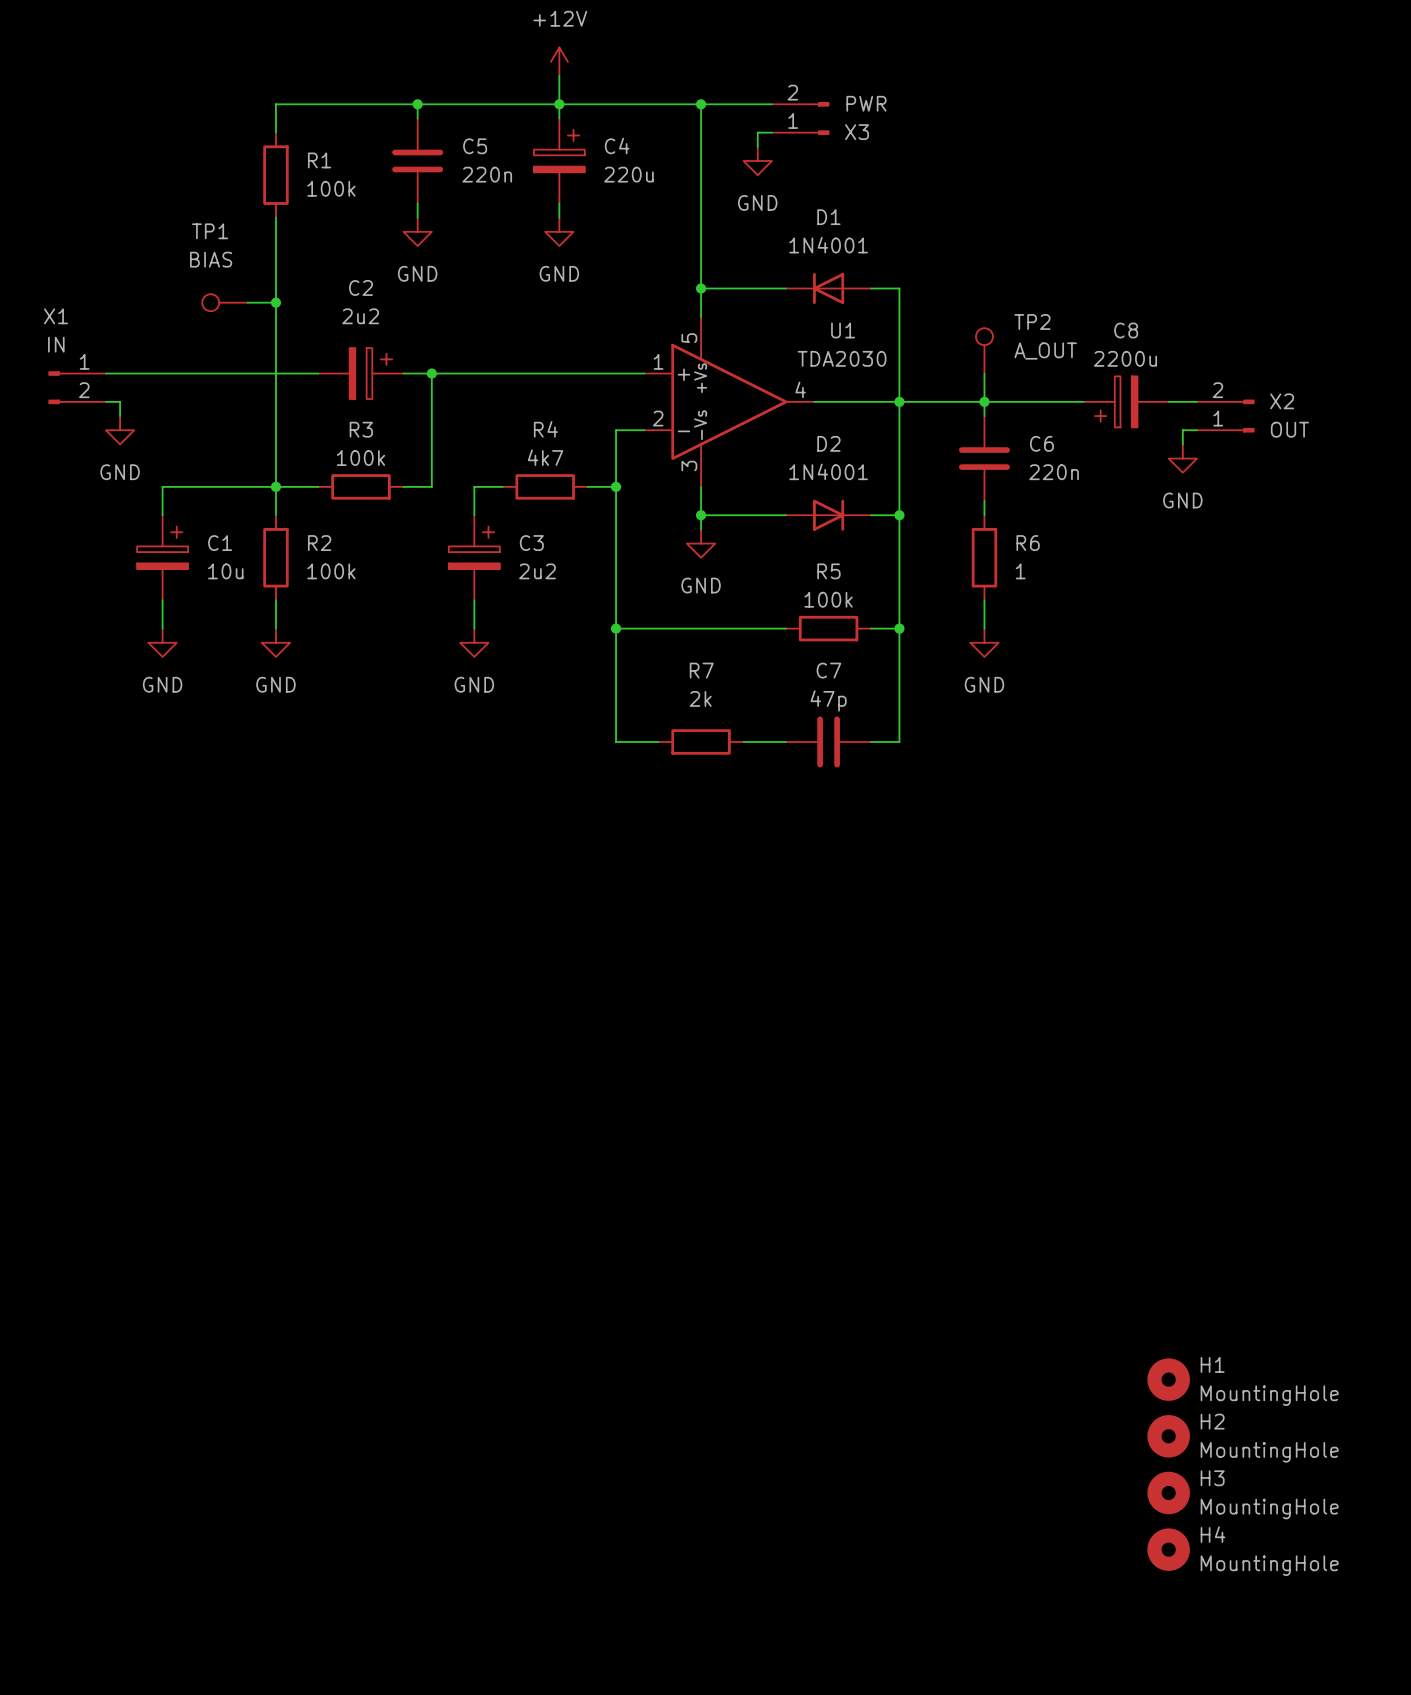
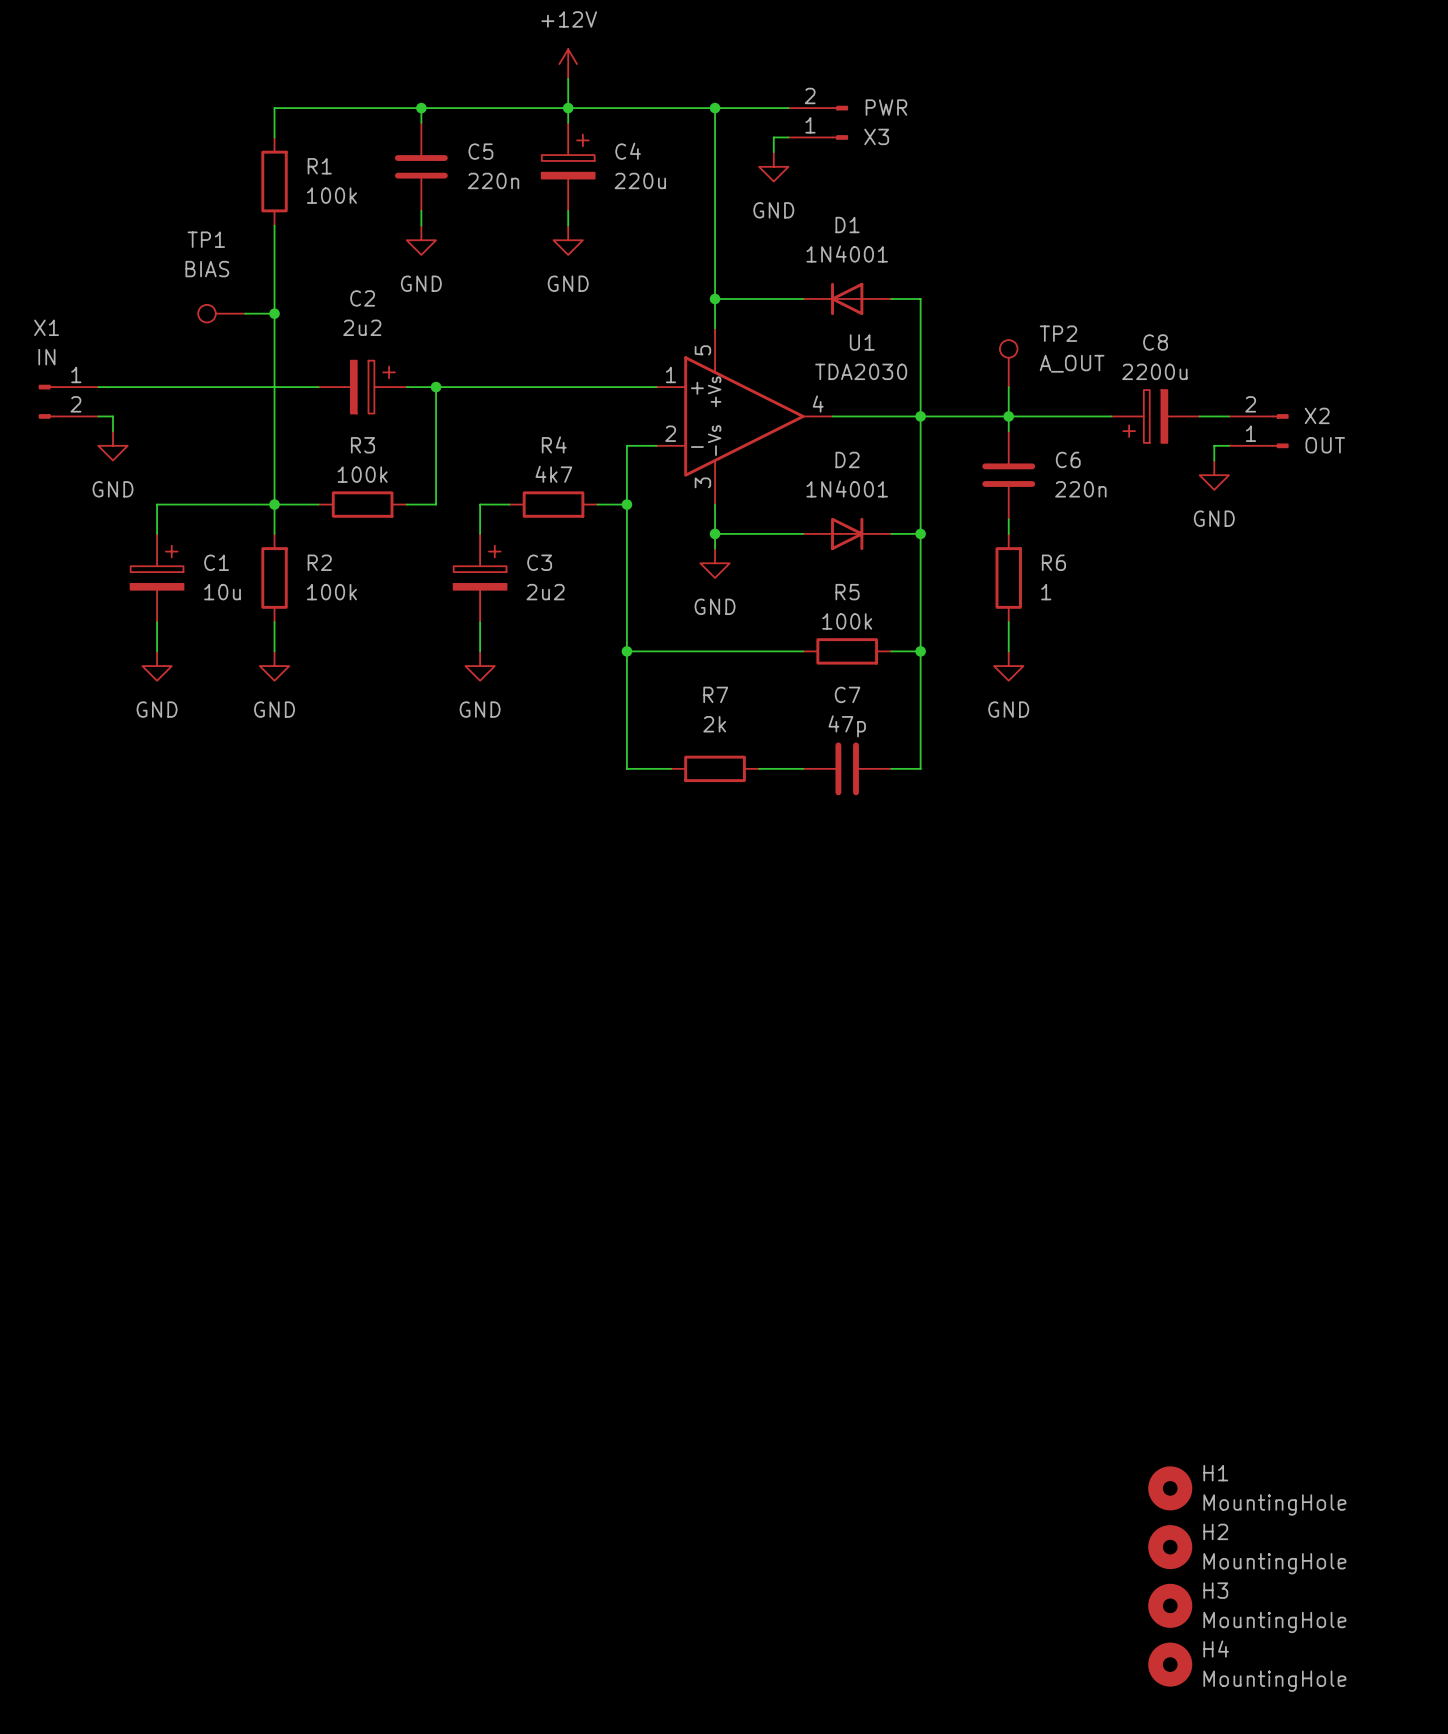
H1 position: (1168, 1379) -> (1170, 1488)
H2 position: (1168, 1436) -> (1170, 1547)
H3 position: (1168, 1492) -> (1170, 1605)
H4 position: (1168, 1549) -> (1170, 1664)

